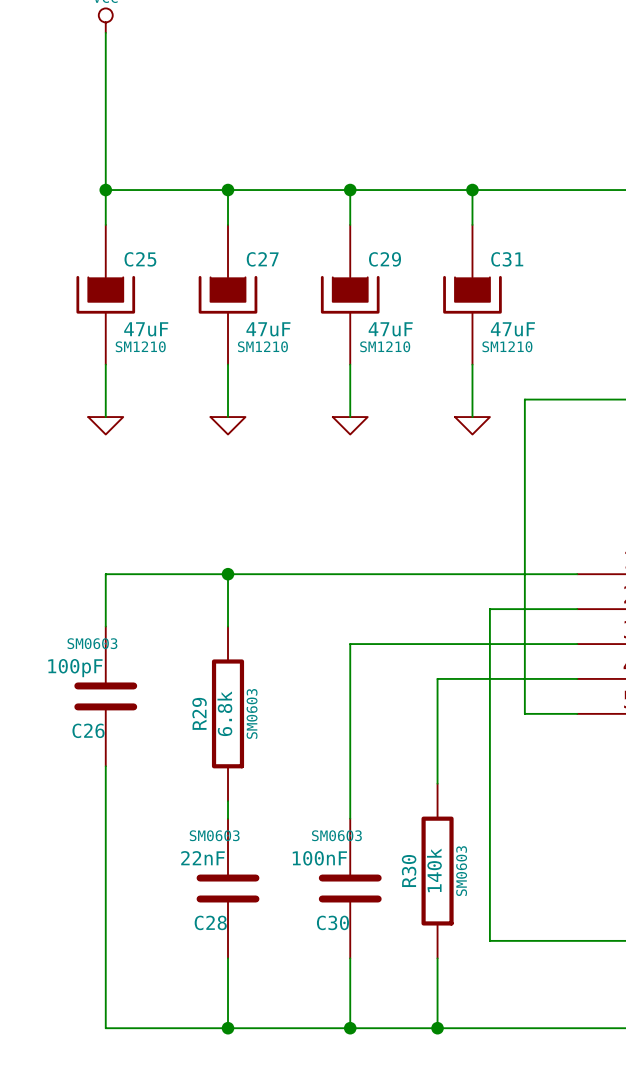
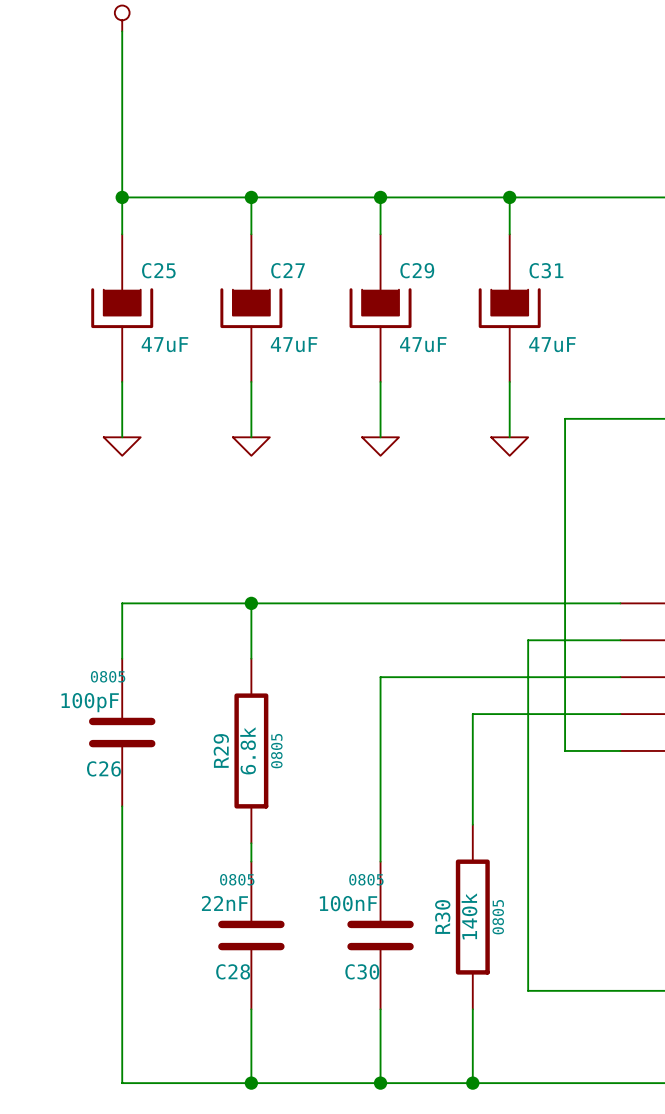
C25 text: SM1210 (140, 346) -> none
C27 text: SM1210 (262, 346) -> none
C29 text: SM1210 (385, 346) -> none
C31 text: SM1210 (507, 346) -> none
C26 text: SM0603 (92, 643) -> 0805 (108, 676)
R29 text: SM0603 (252, 713) -> 0805 (276, 751)
C28 text: SM0603 (214, 835) -> 0805 (237, 879)
C30 text: SM0603 (336, 835) -> 0805 (366, 879)
R30 text: SM0603 (461, 871) -> 0805 (498, 917)

